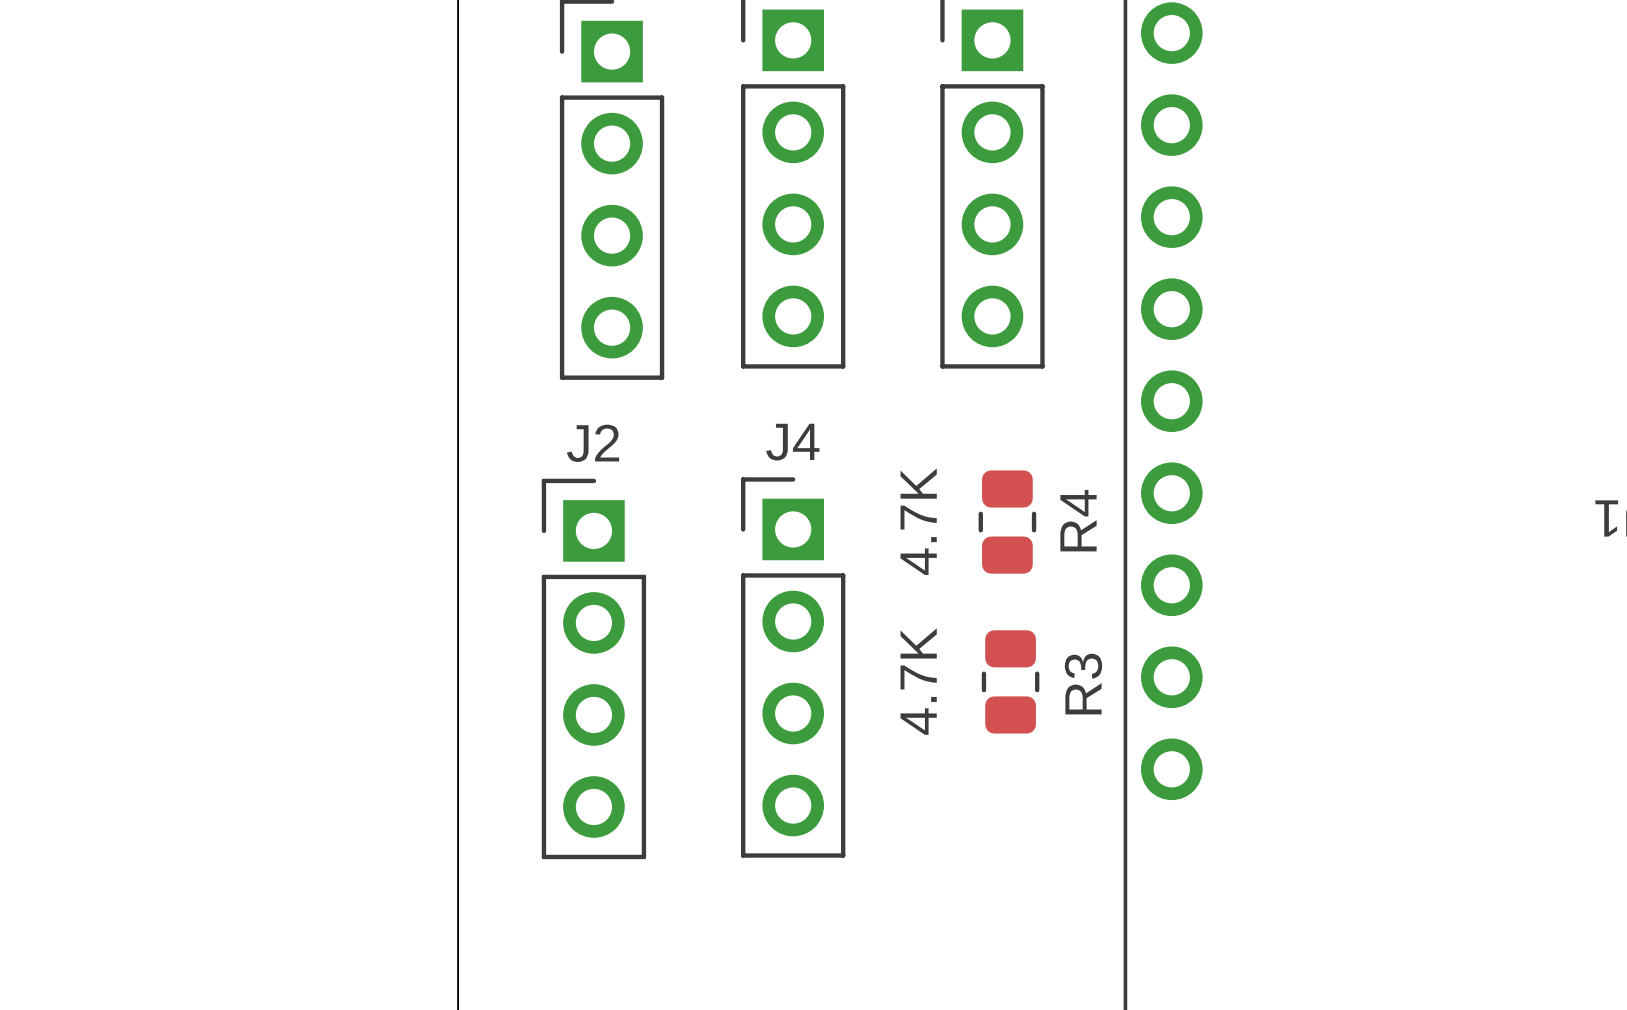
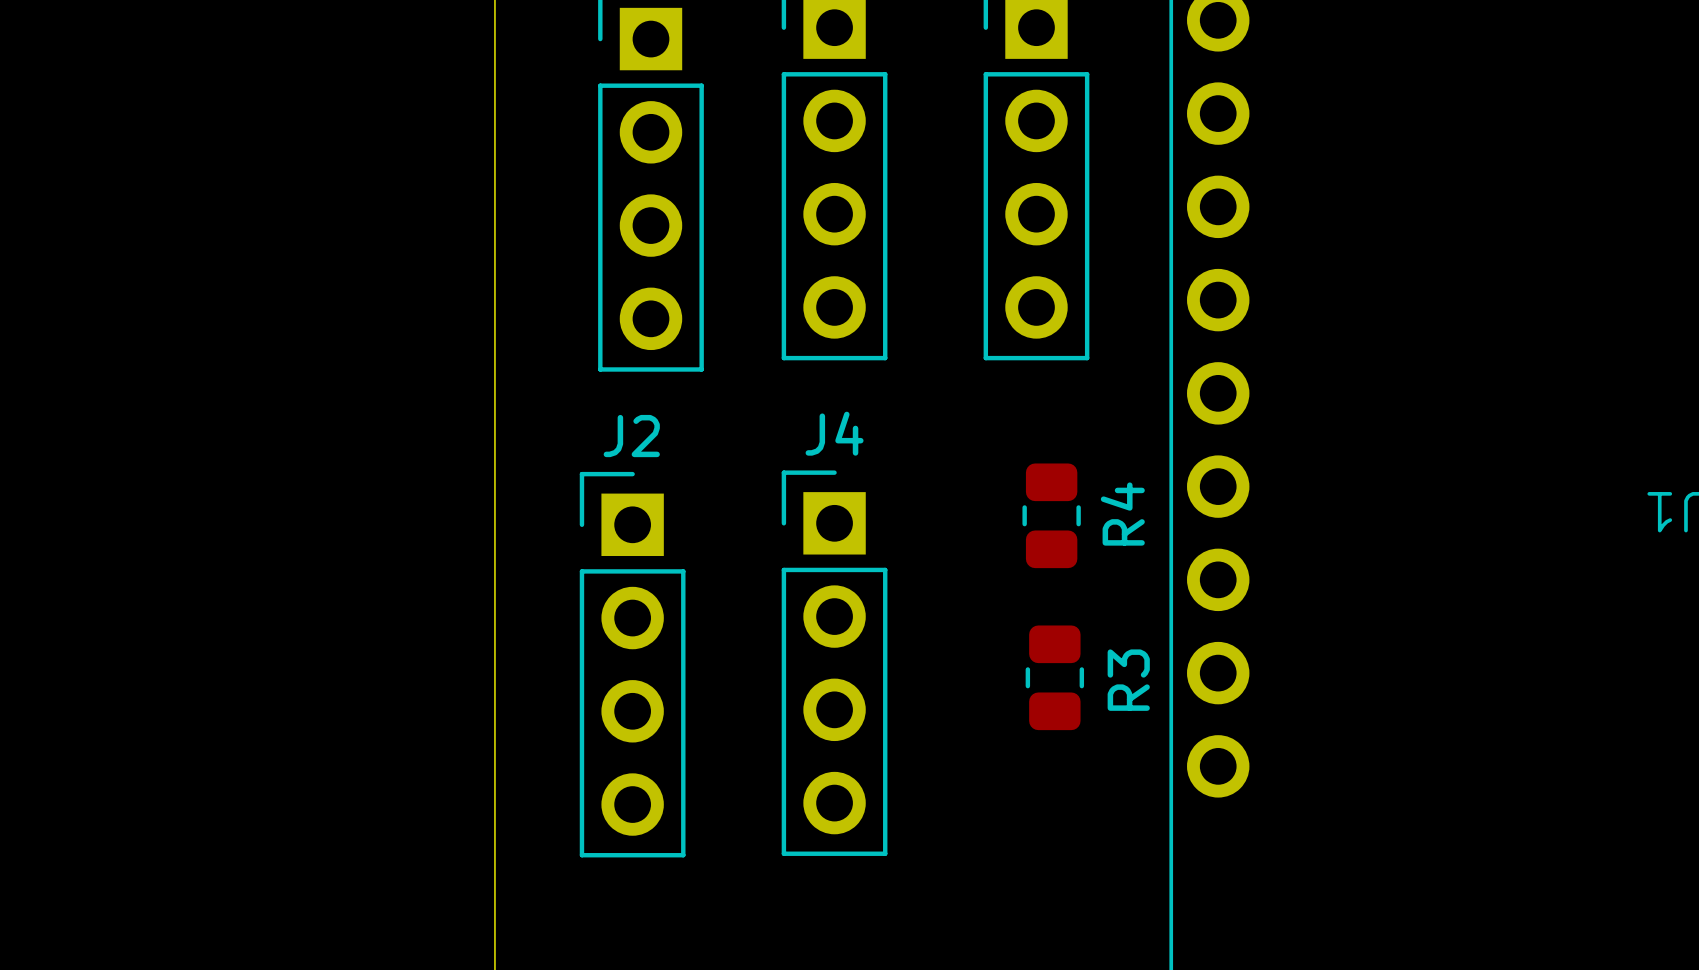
R4 value: 4.7K (918, 521) -> none
R3 value: 4.7K (918, 681) -> none

